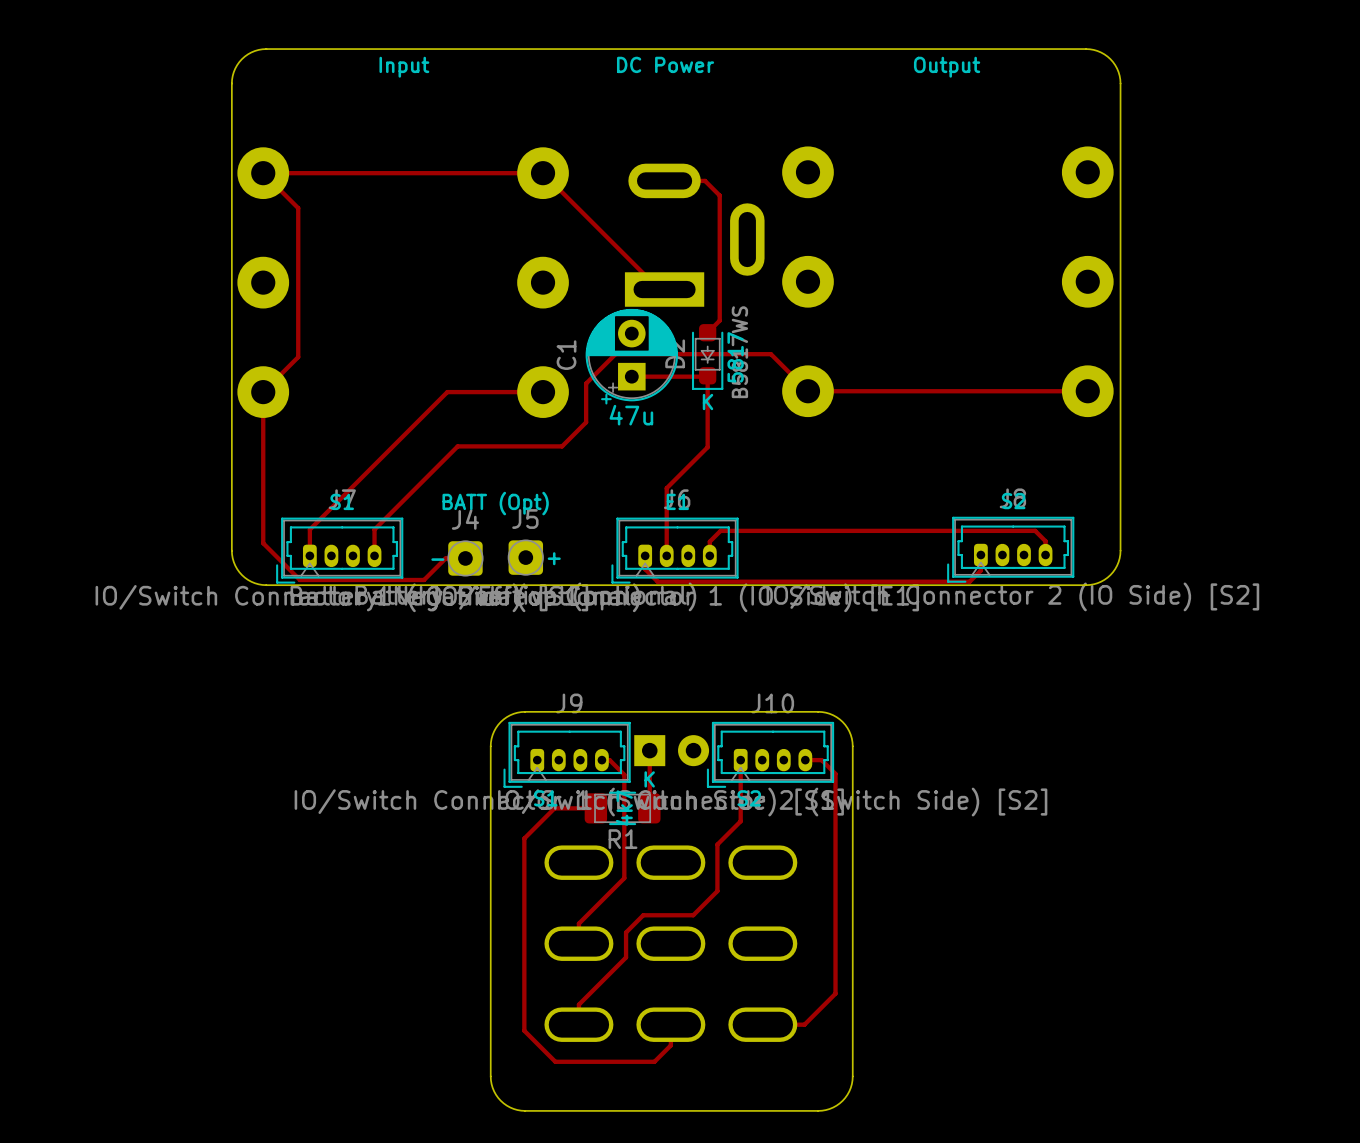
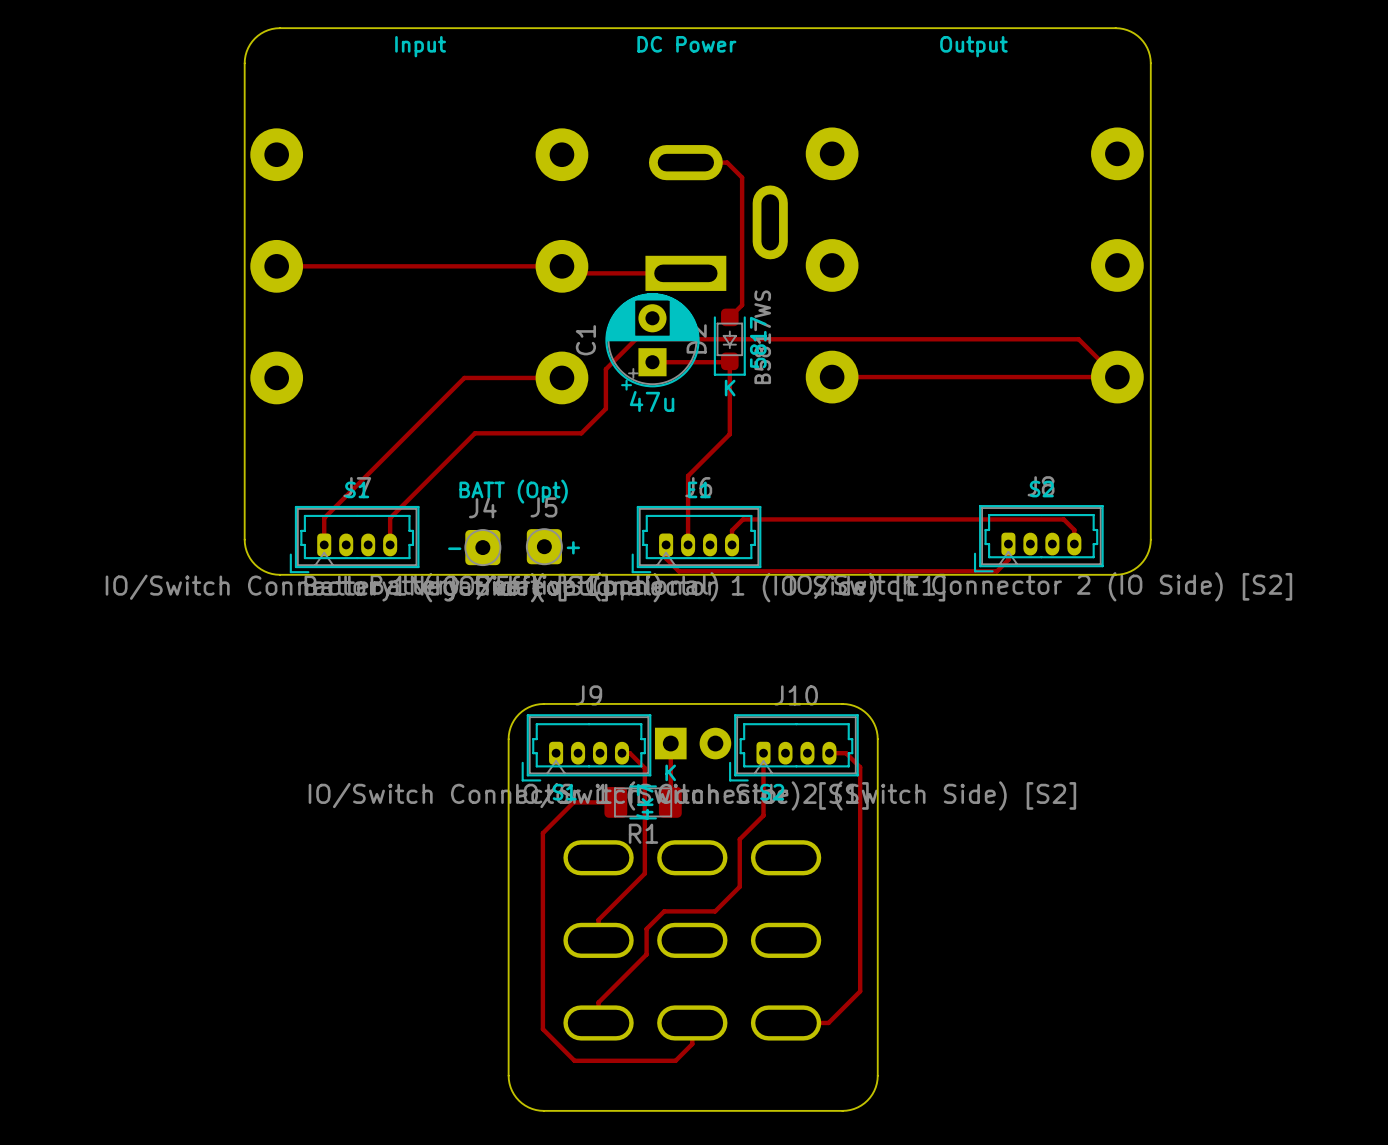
track: none -> (276, 266) (561, 266)
track: (659, 289) (543, 173) (263, 173) (298, 208) (298, 357) (263, 392) (263, 543) (299, 580) (424, 580) (445, 558) (465, 558) -> (680, 273) (568, 273)
track: (770, 354) (807, 391) -> (794, 339) (1078, 339) (1117, 377)

